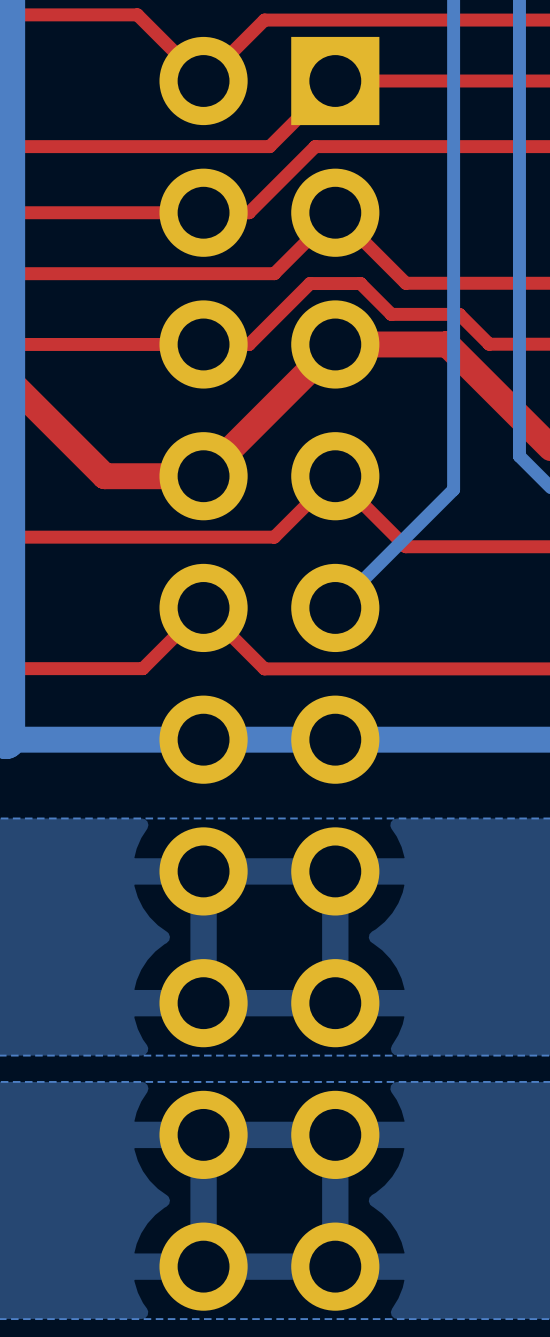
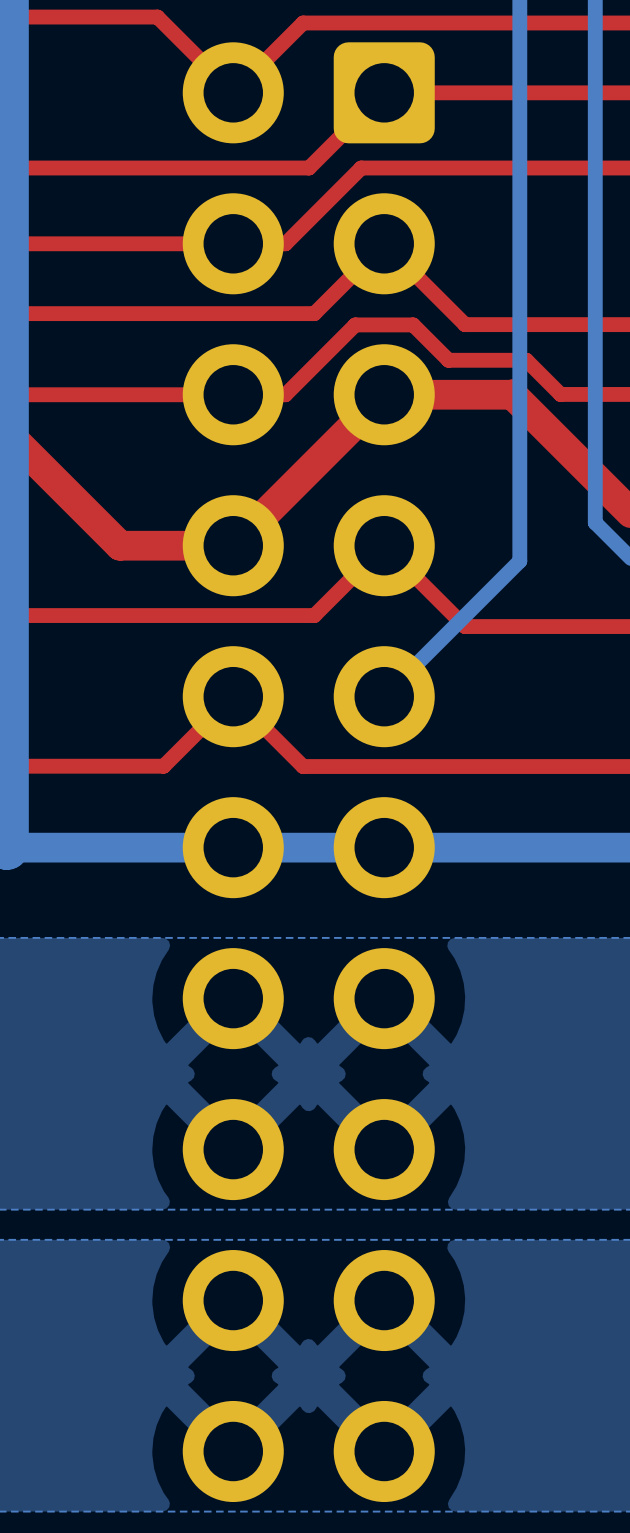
part footprint: [159, 36, 380, 1311] -> [182, 42, 435, 1503]

